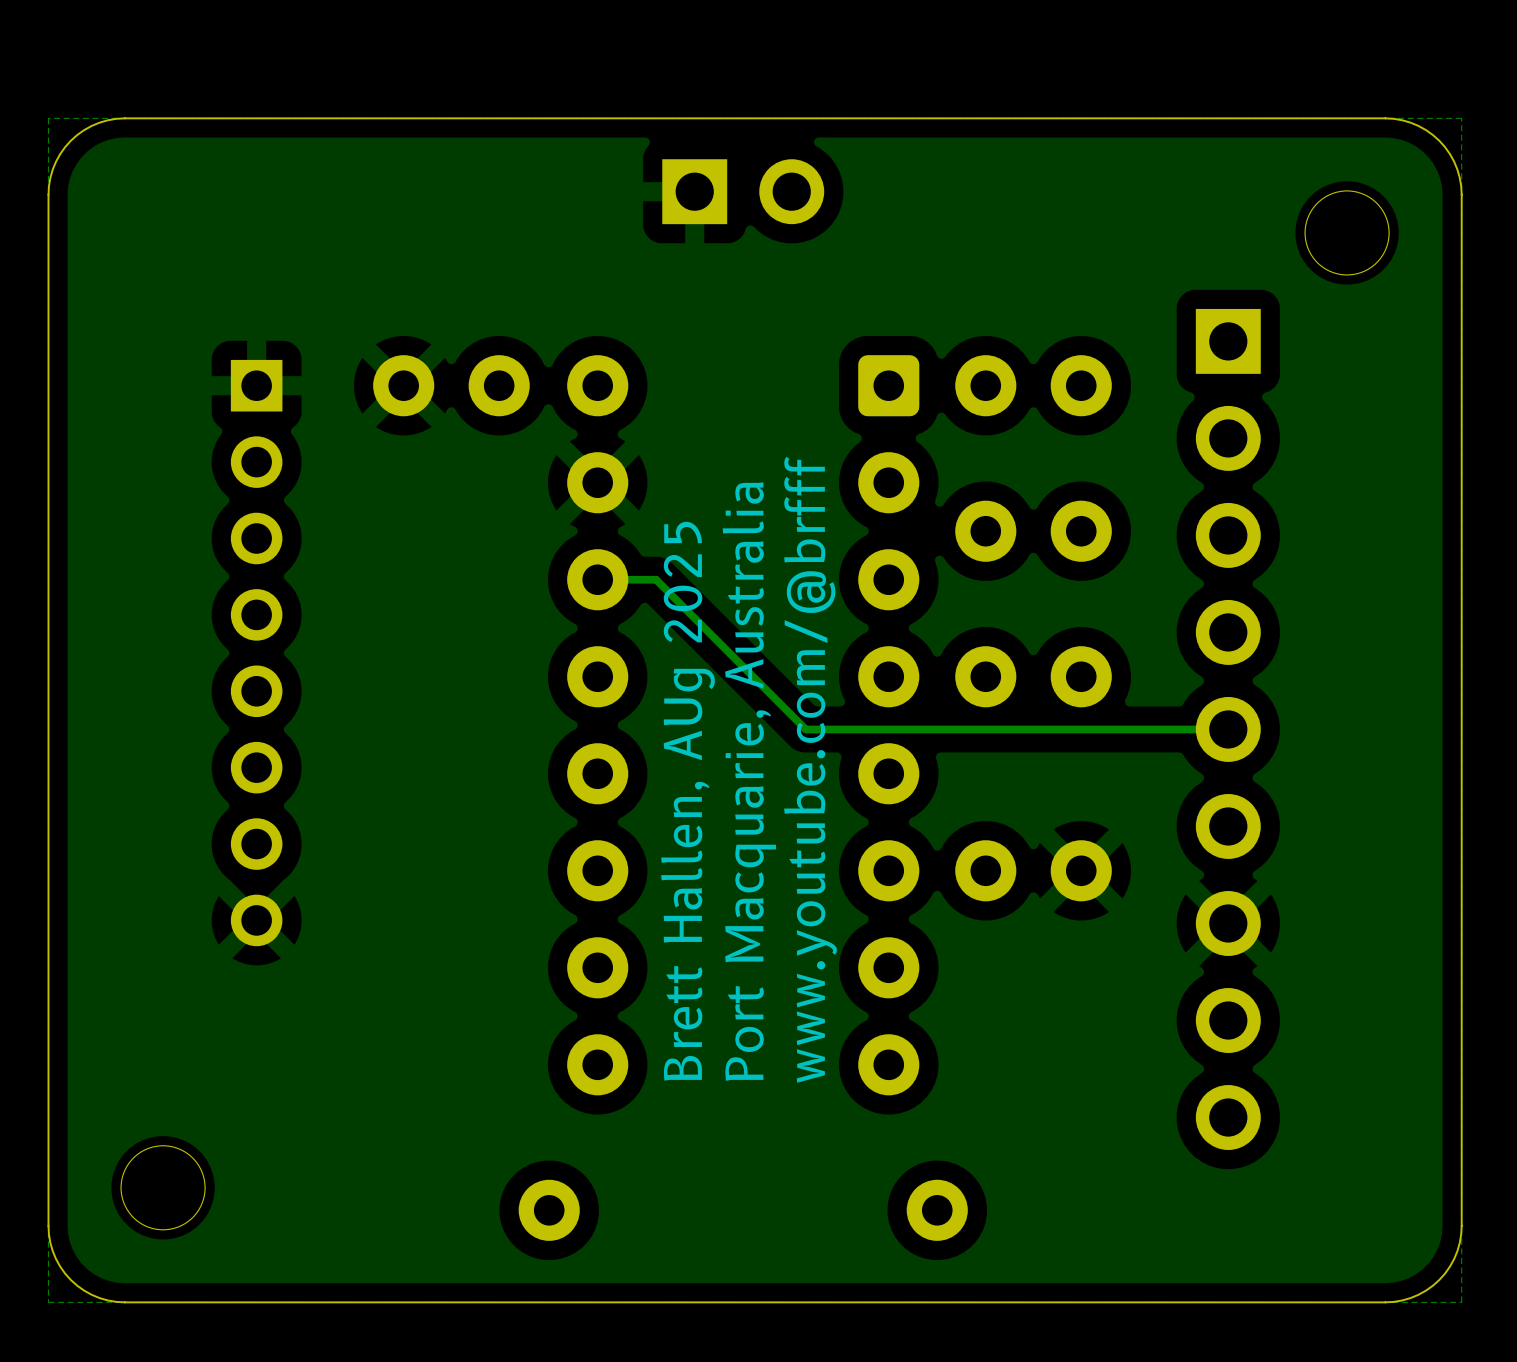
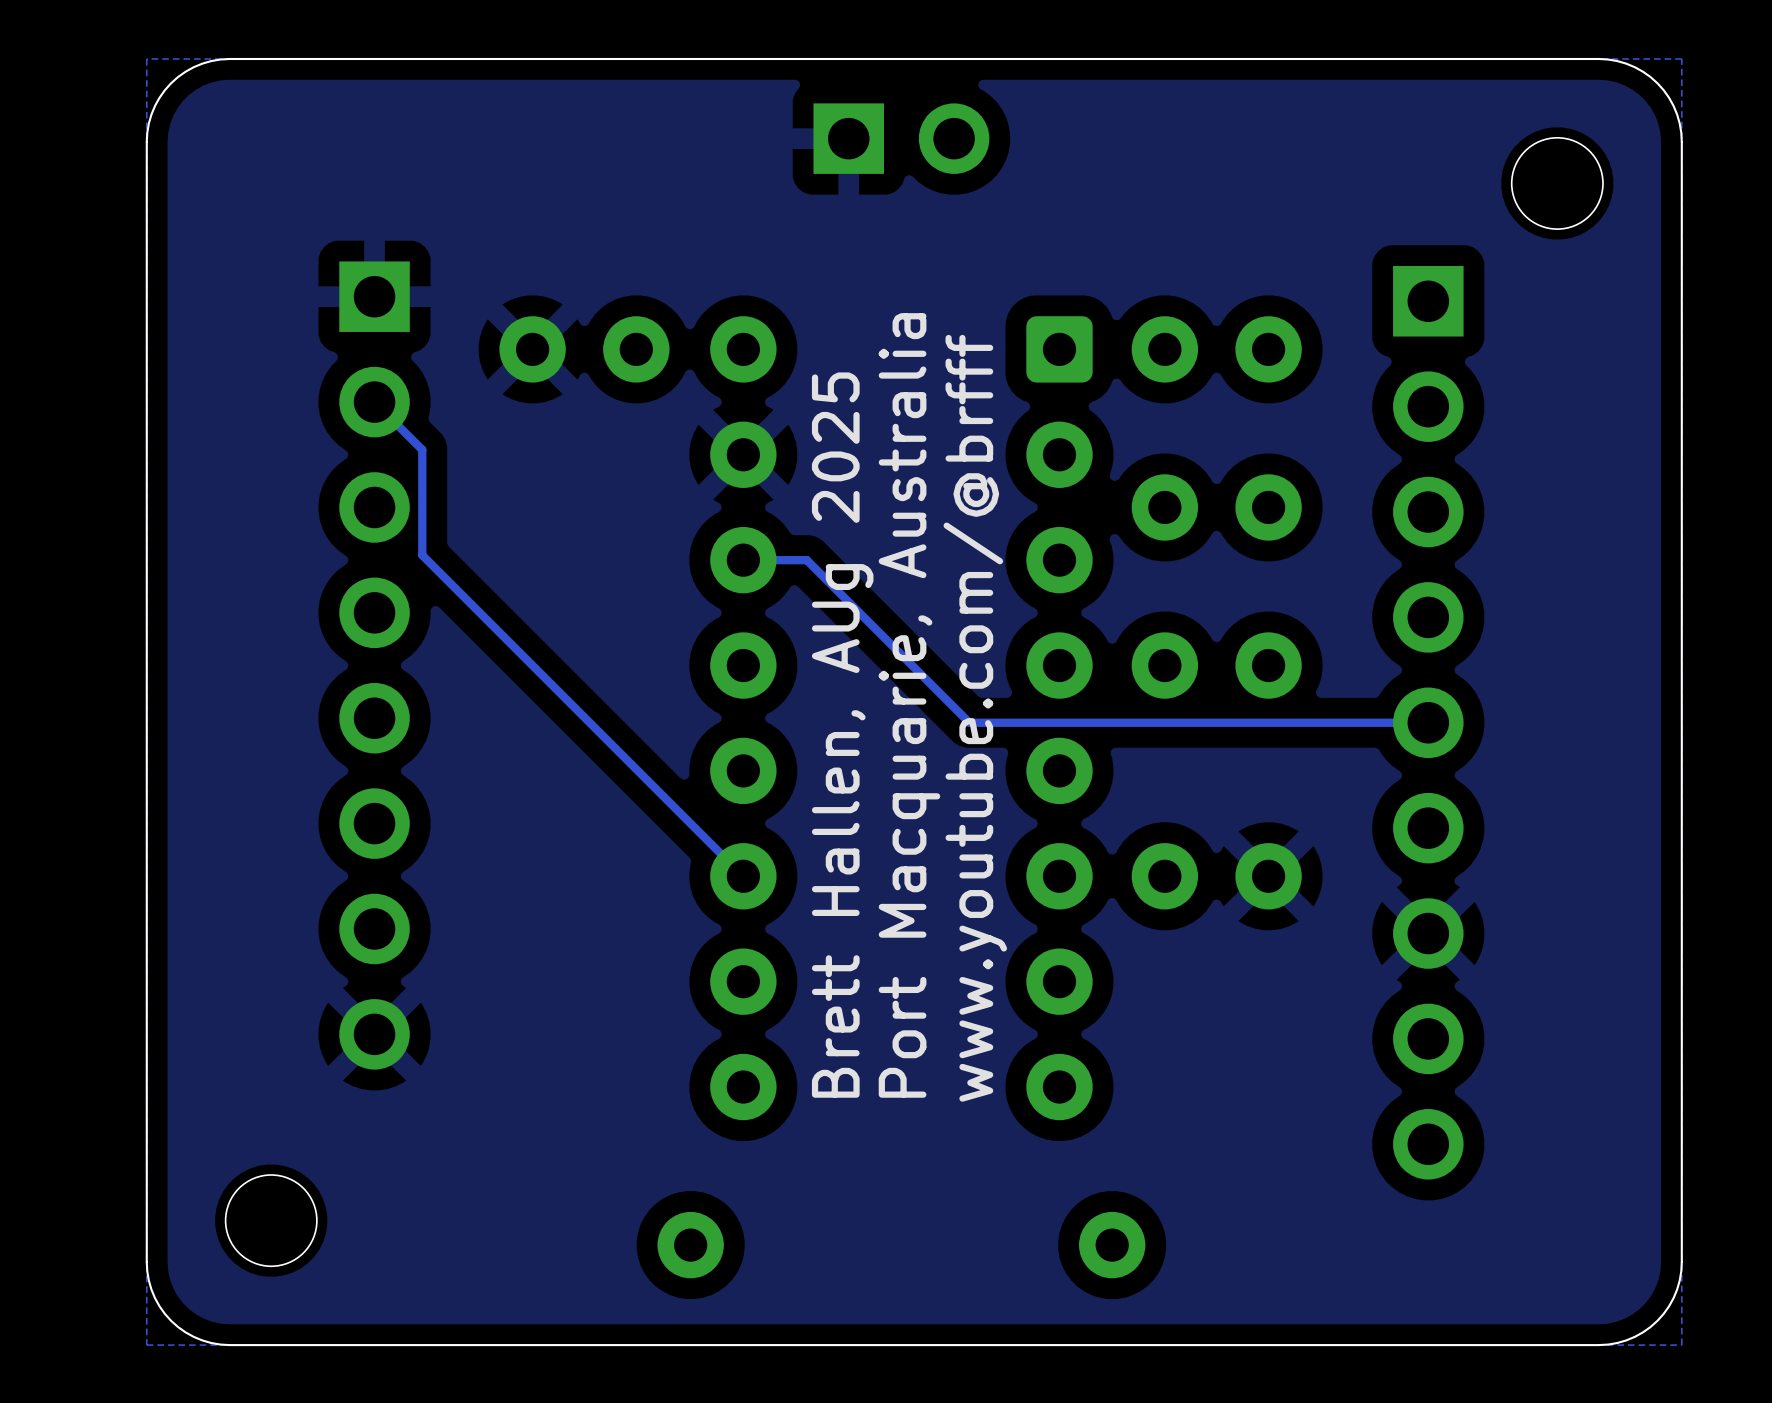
part footprint: [230, 359, 283, 947] -> [339, 261, 410, 1070]
track: none -> (374, 402) (422, 449) (422, 555) (743, 876)

